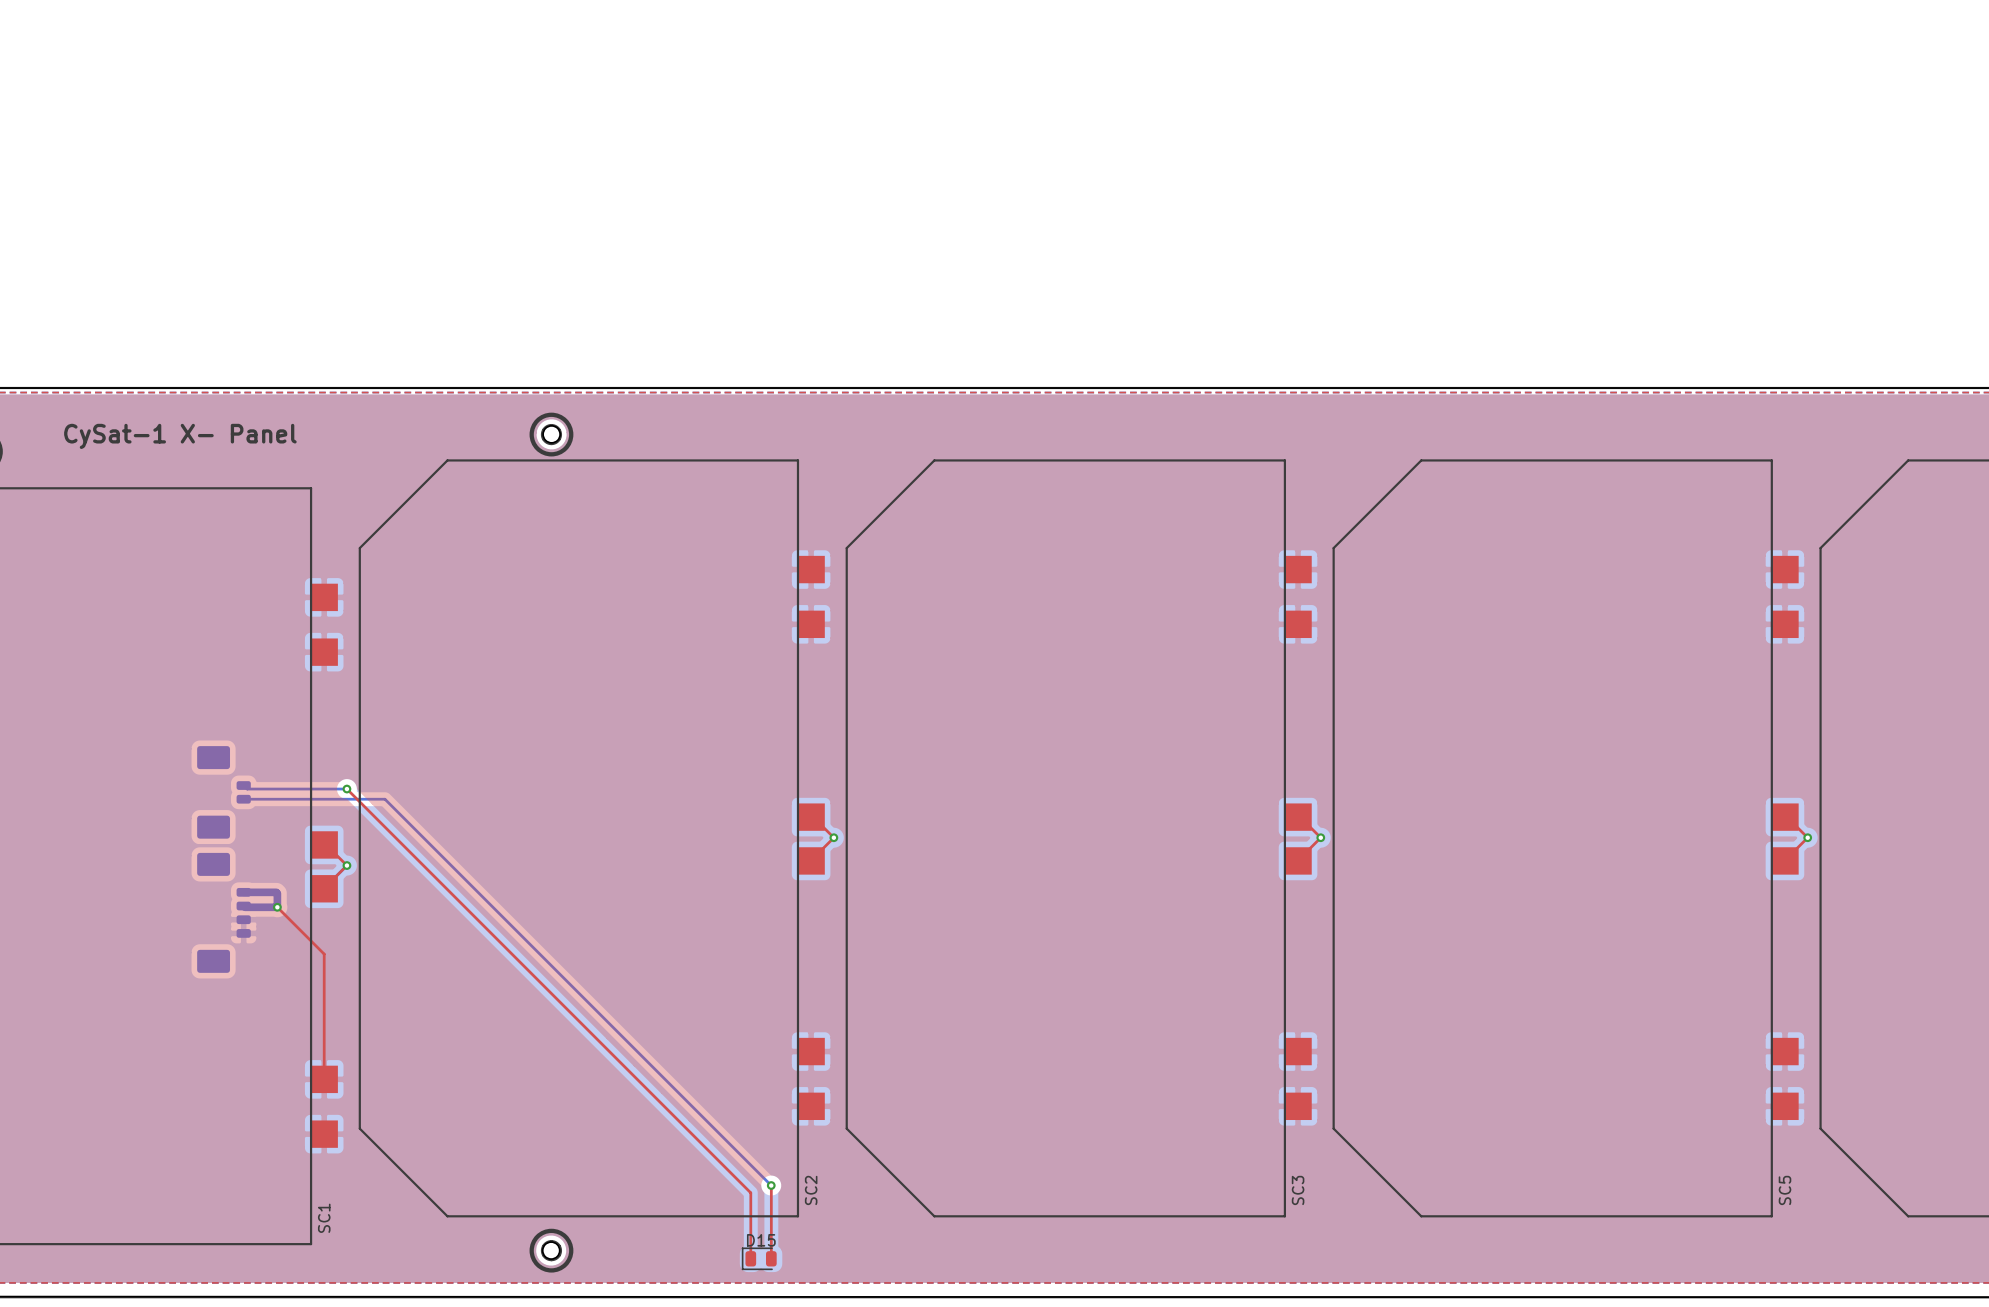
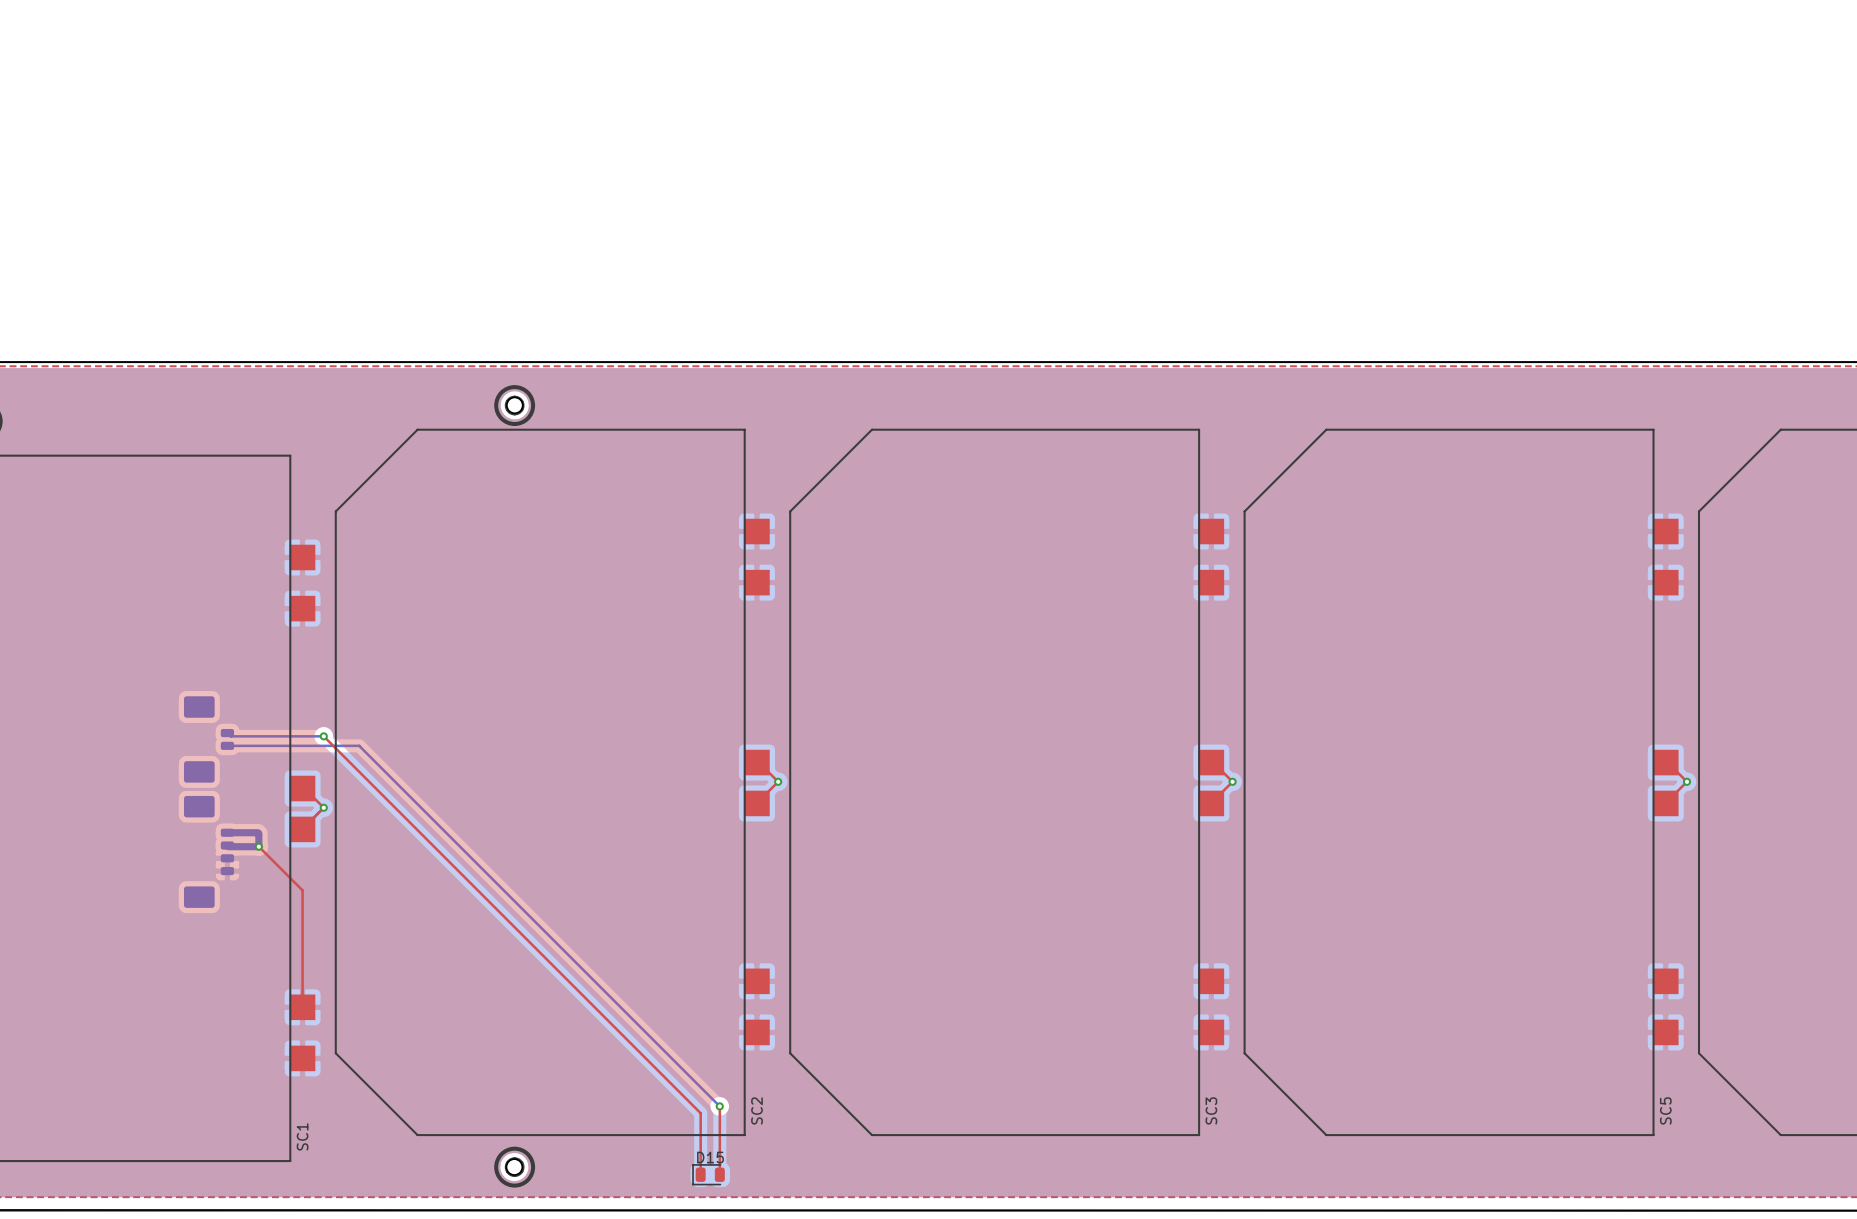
text: CySat-1 X- Panel (180, 436) -> none

